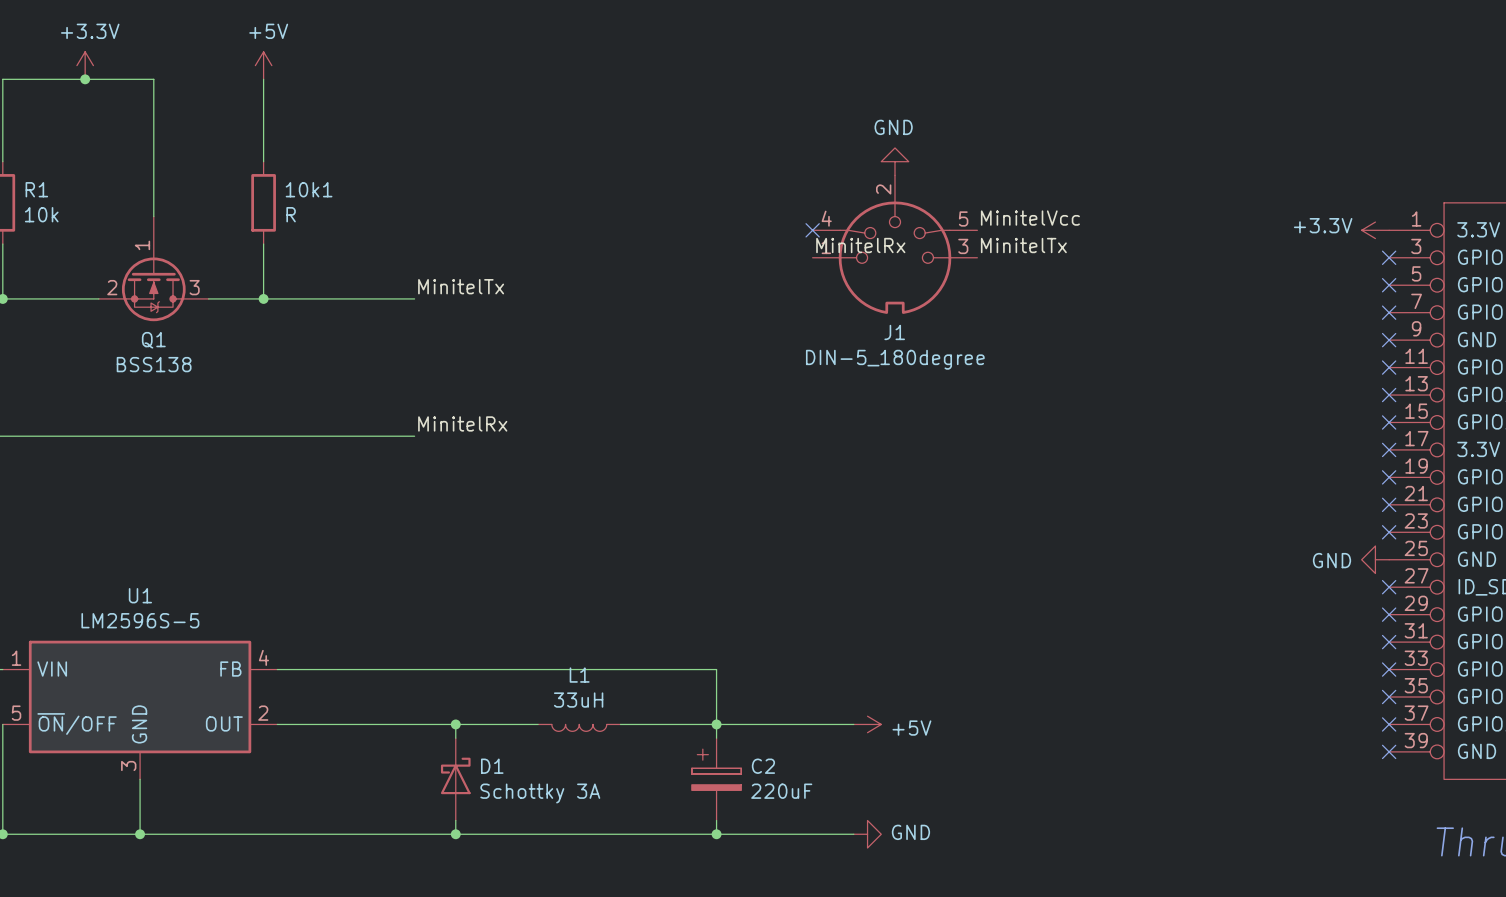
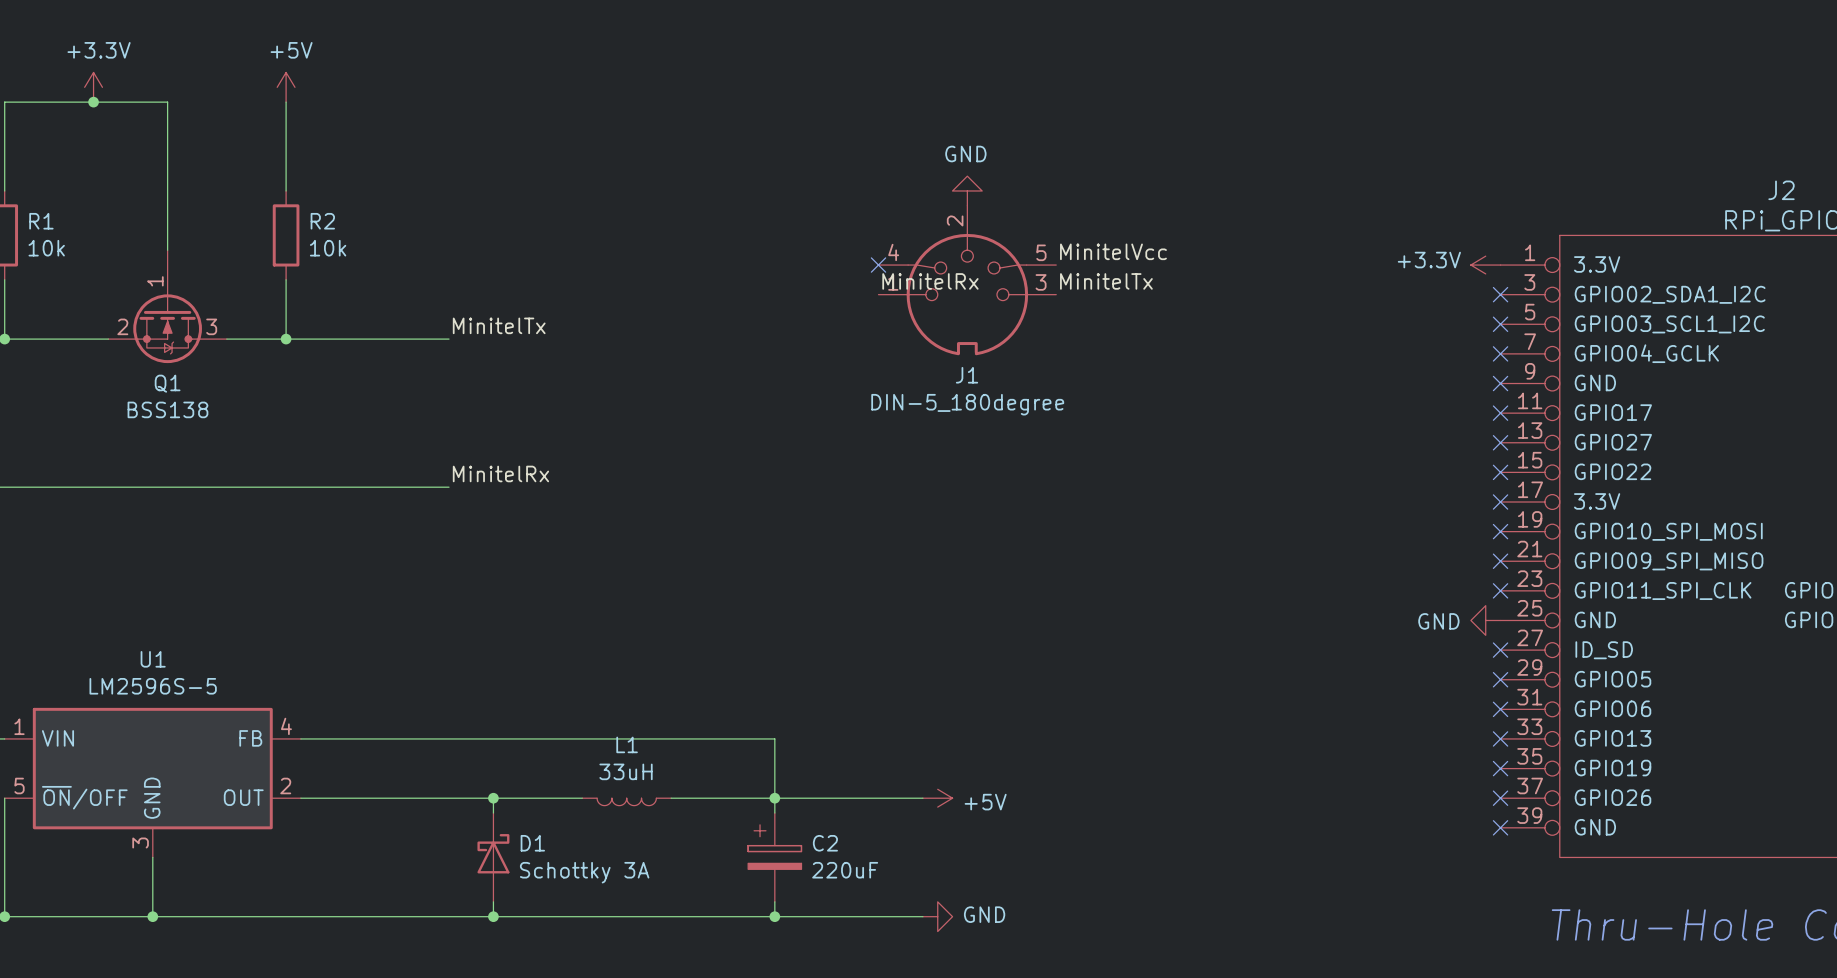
10k1 name: 10k1 (309, 189) -> R2 (322, 221)
10k1 value: R (291, 214) -> 10k (328, 248)

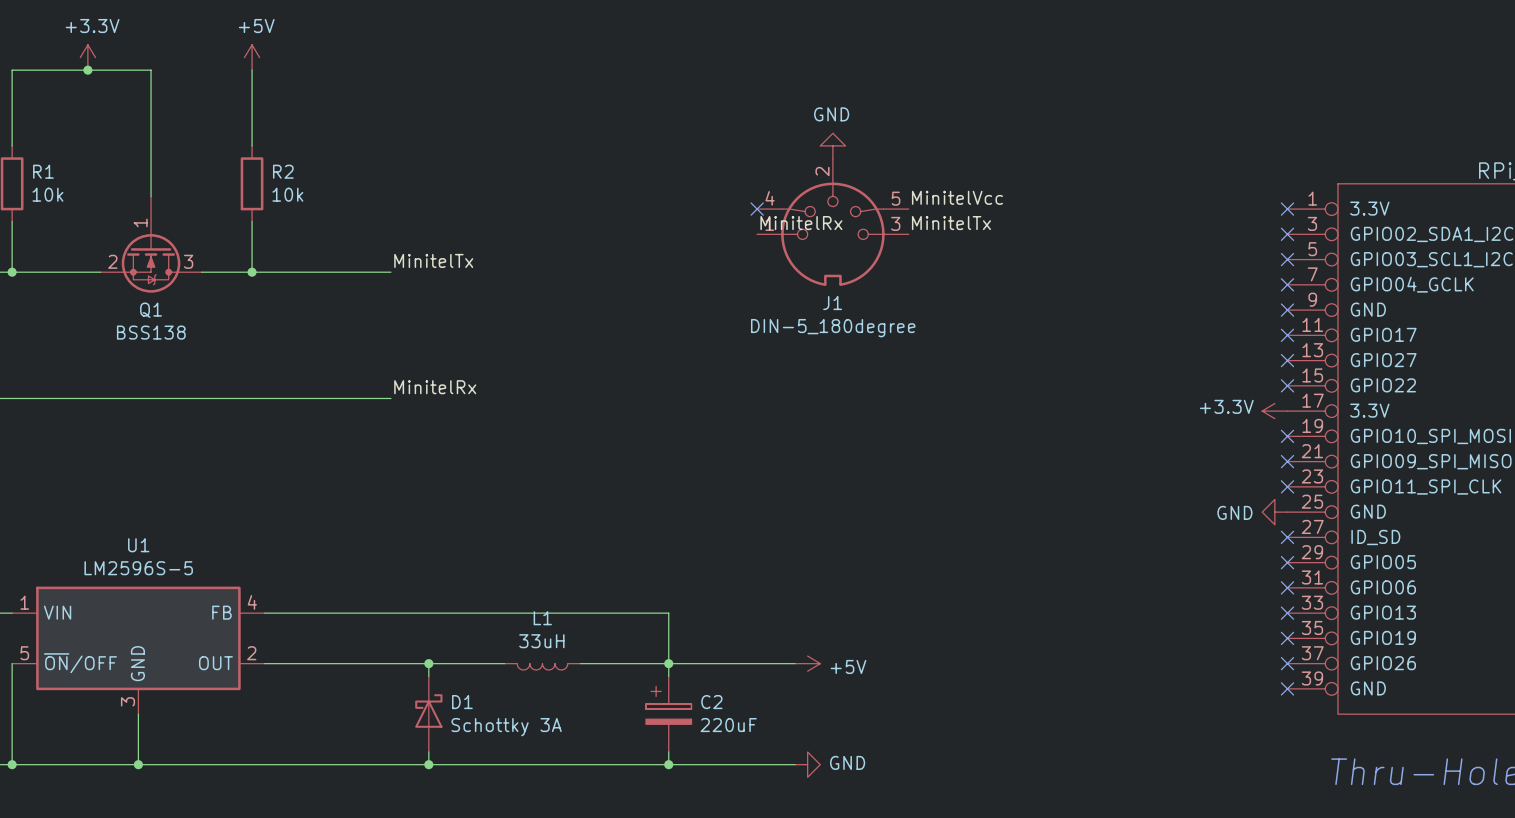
power symbol position: +3.3V (1485, 265) -> +3.3V (1274, 411)
no-connect mark: none -> (1287, 209)
no-connect mark: (1500, 502) -> none

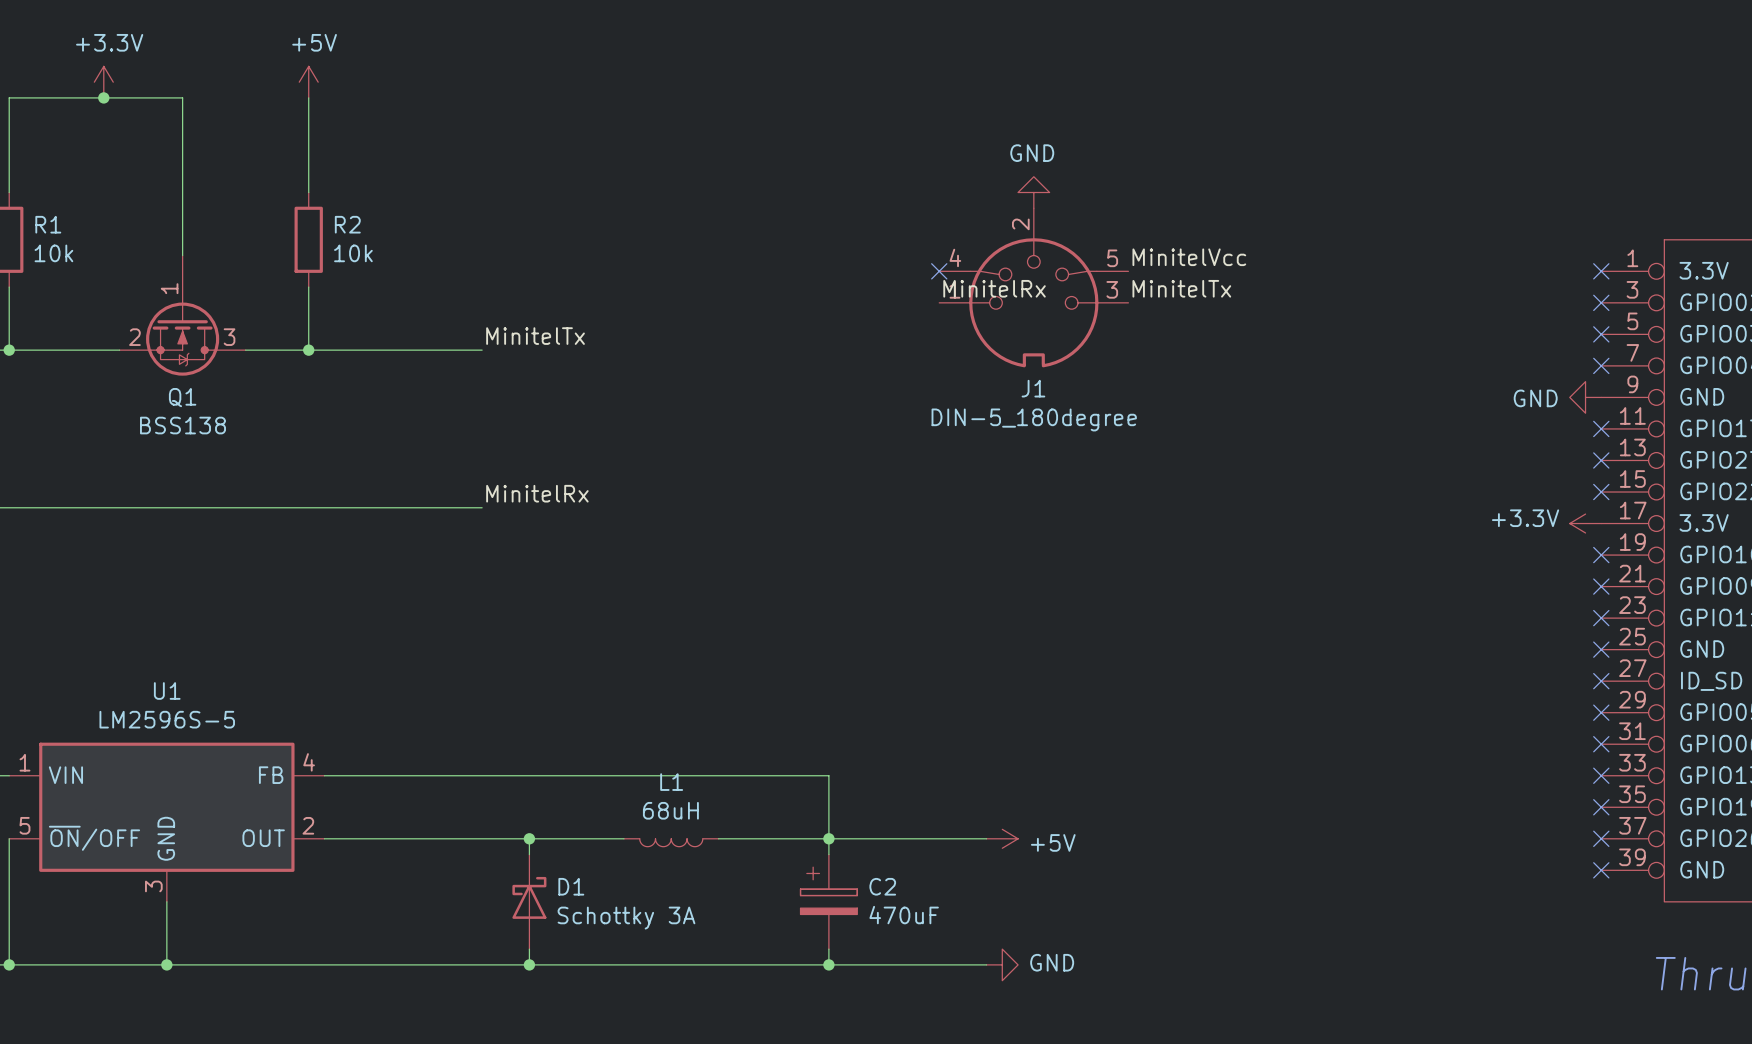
no-connect mark: (1287, 310) -> none
power symbol position: GND (1274, 512) -> GND (1585, 397)
no-connect mark: none -> (1601, 649)
L1 value: 33uH (541, 641) -> 68uH (670, 810)
C2 value: 220uF (728, 725) -> 470uF (904, 915)

